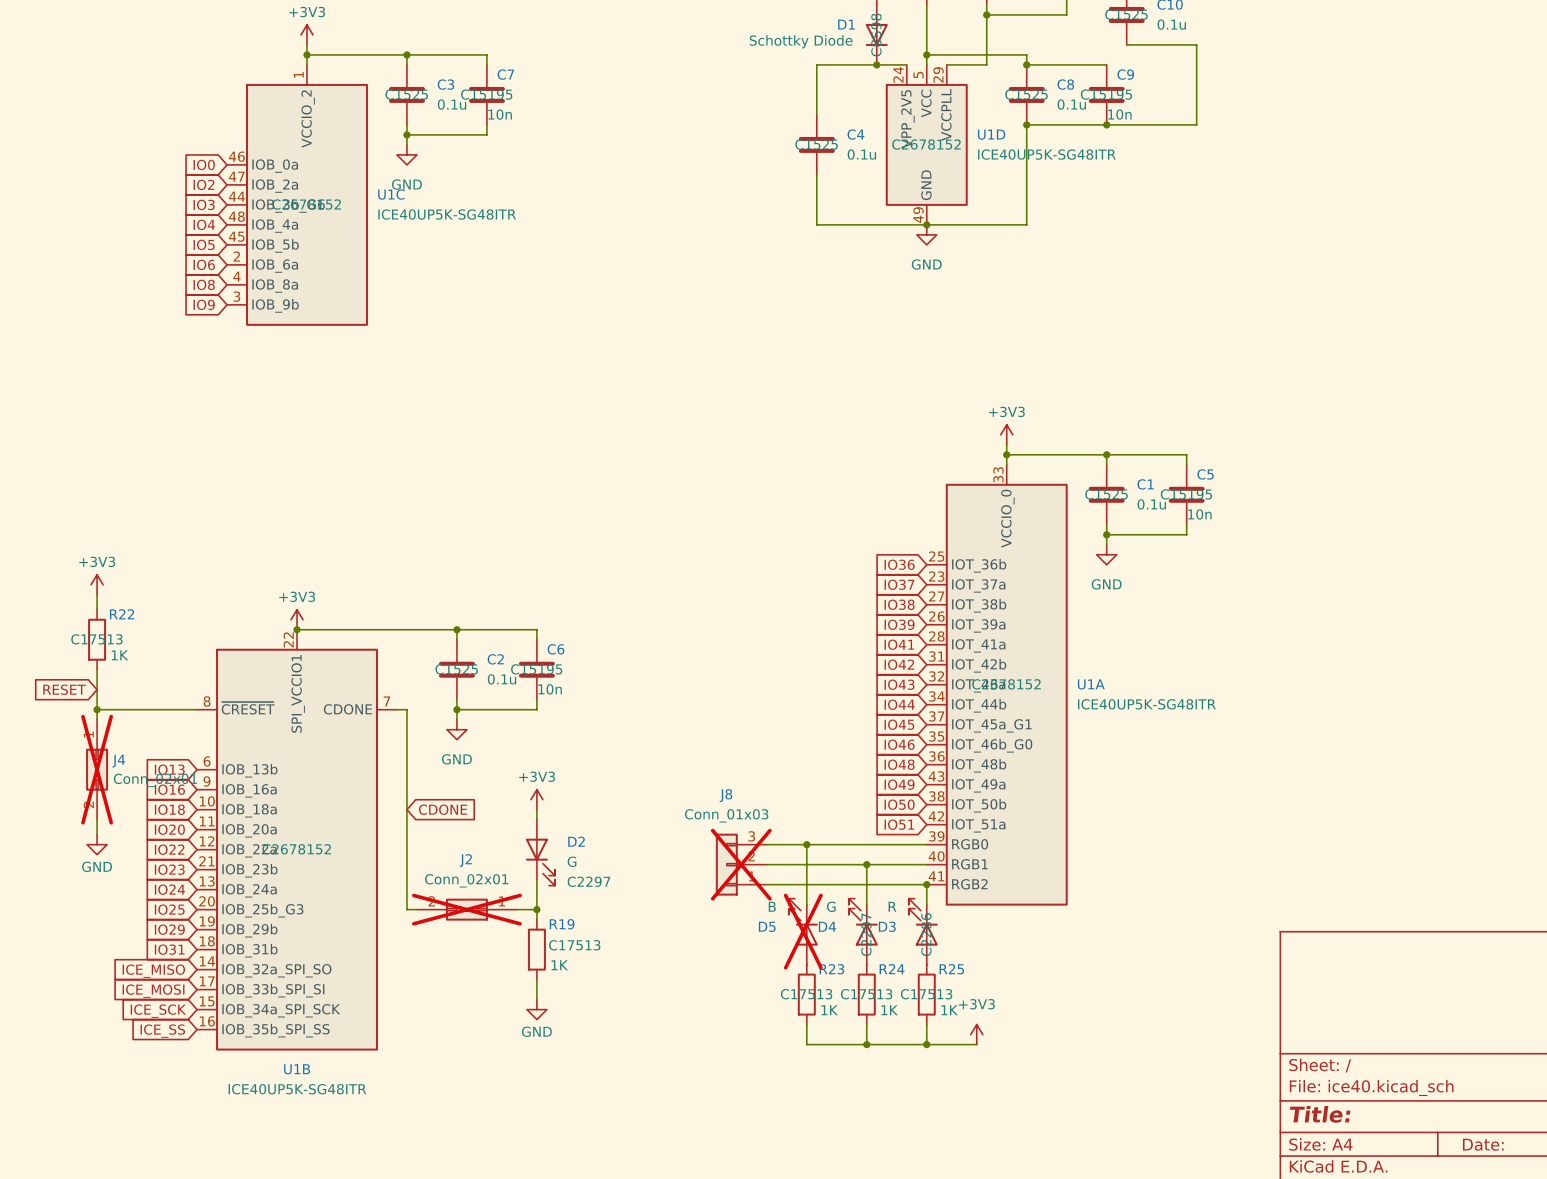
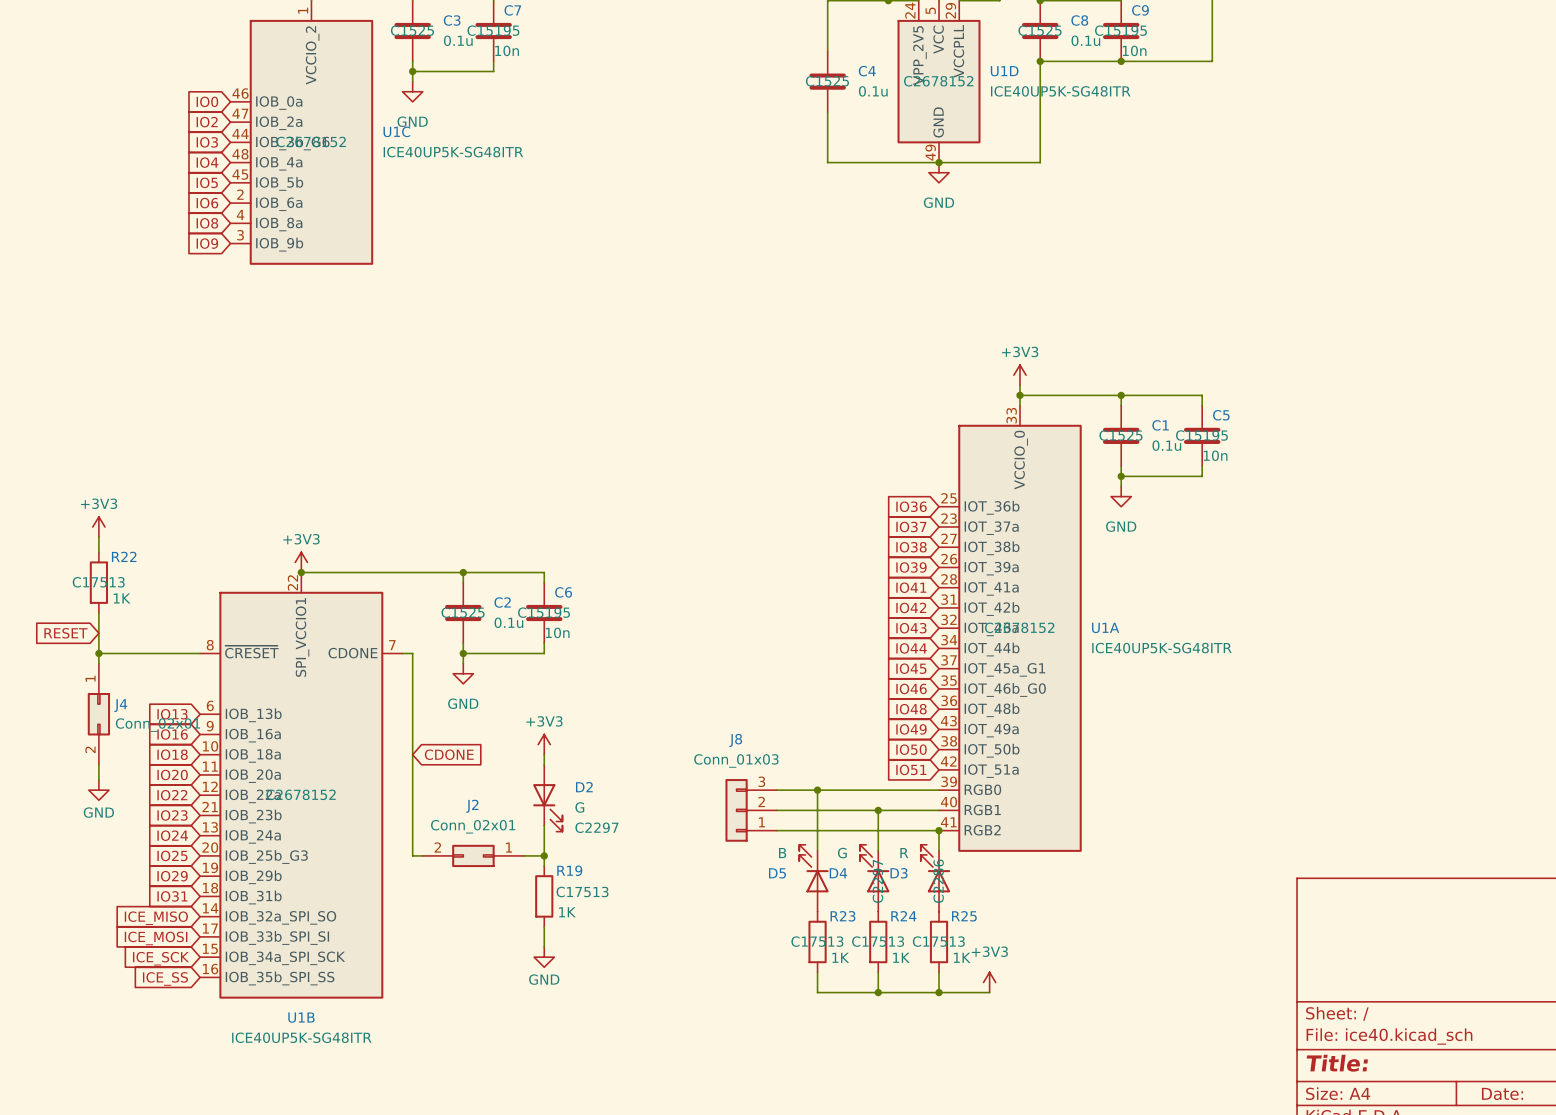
J4 do-not-place cross: (97, 769) -> none
J8 do-not-place cross: (741, 864) -> none
J2 do-not-place cross: (466, 909) -> none
D5 do-not-place cross: (803, 931) -> none

